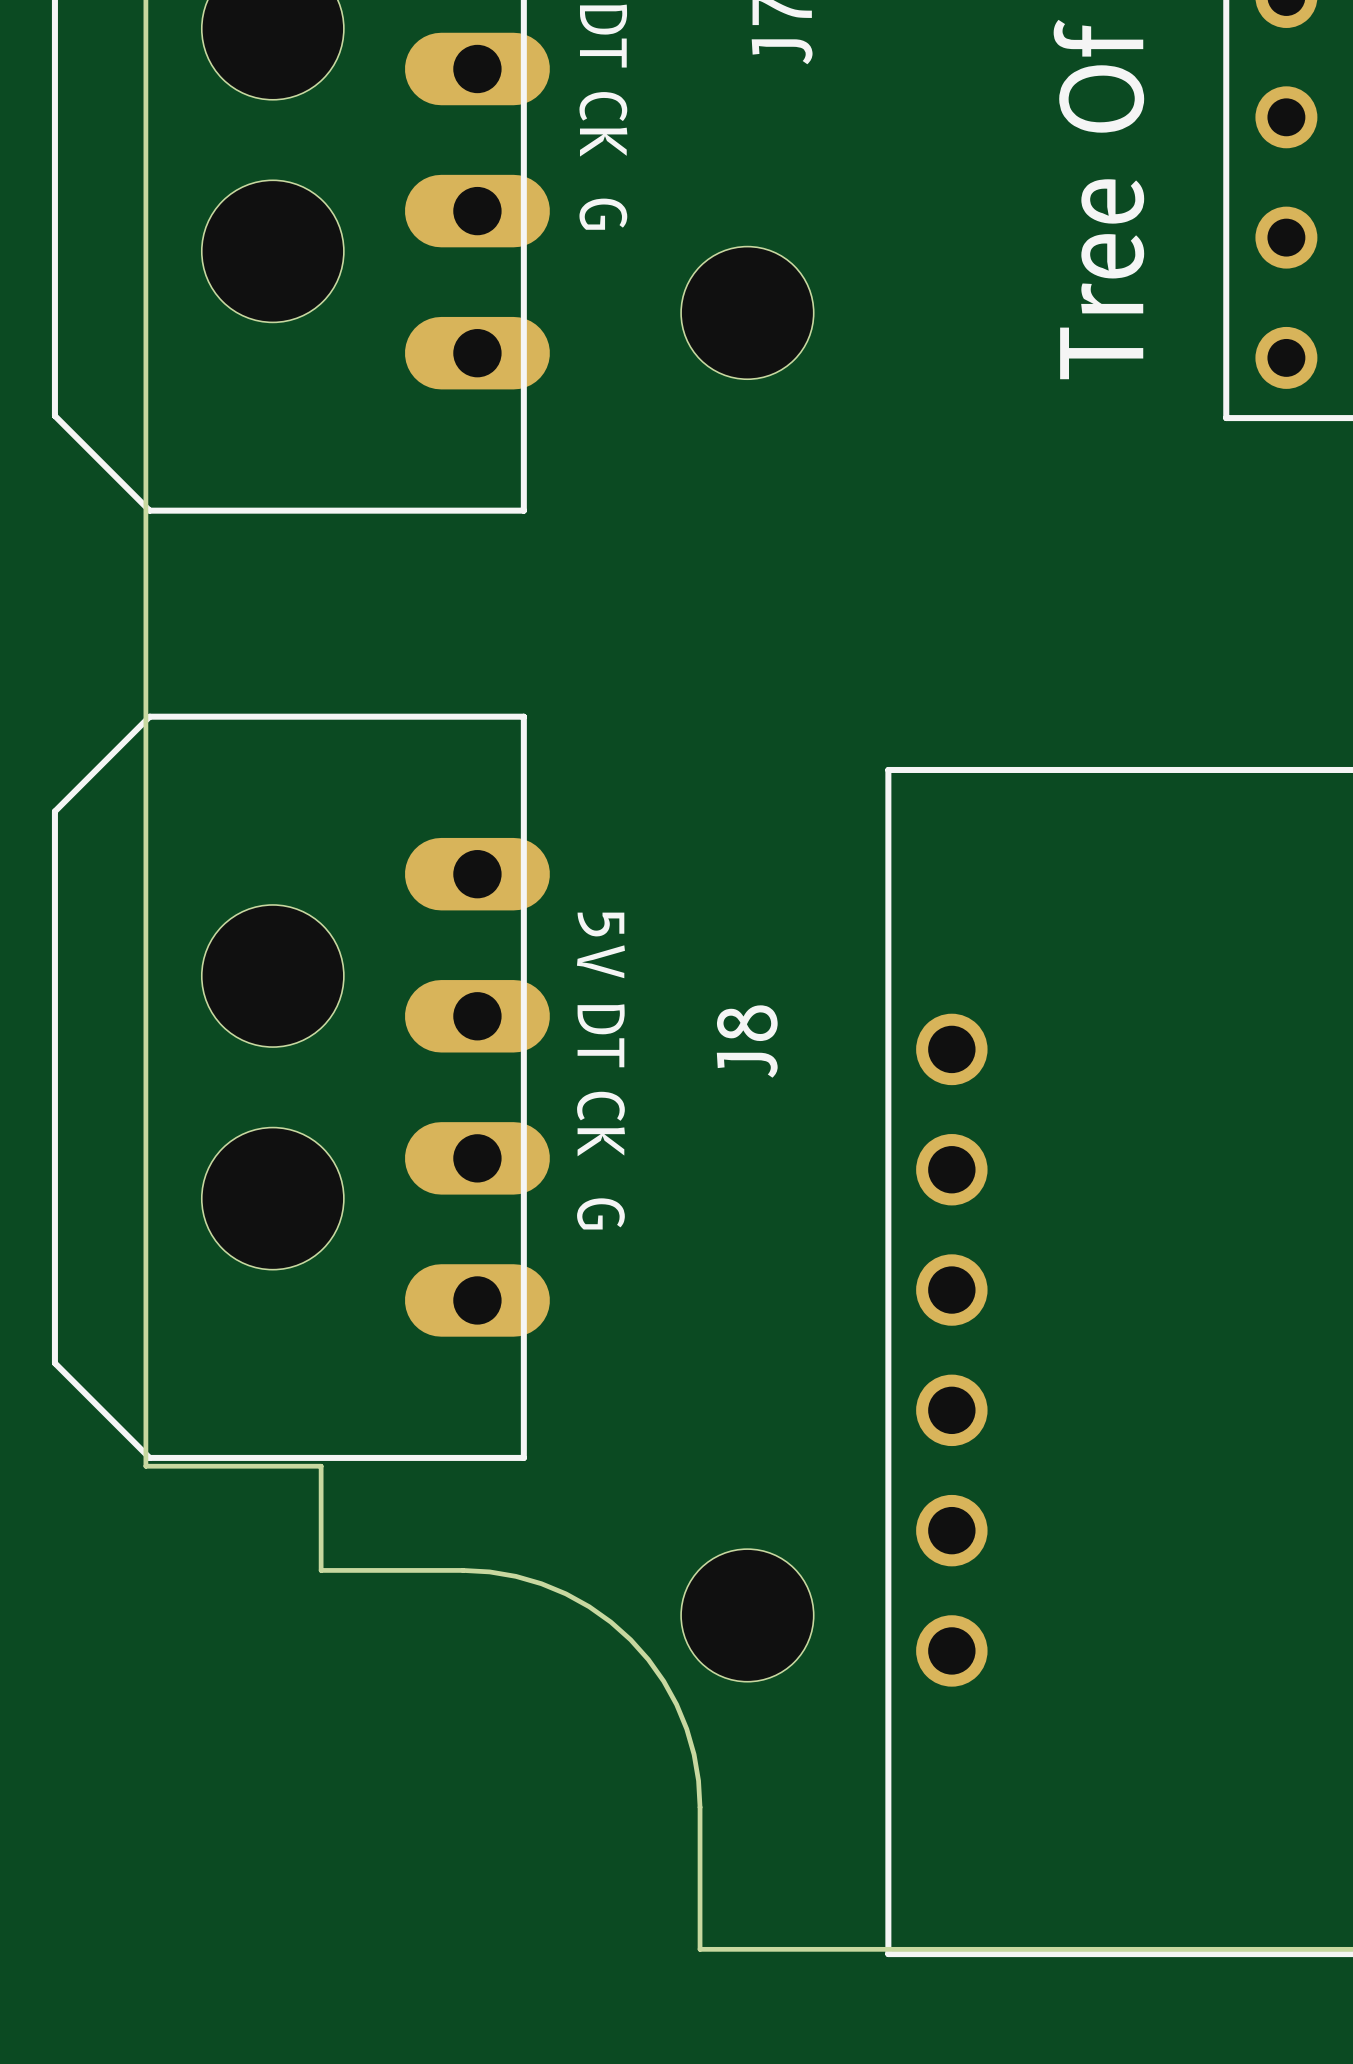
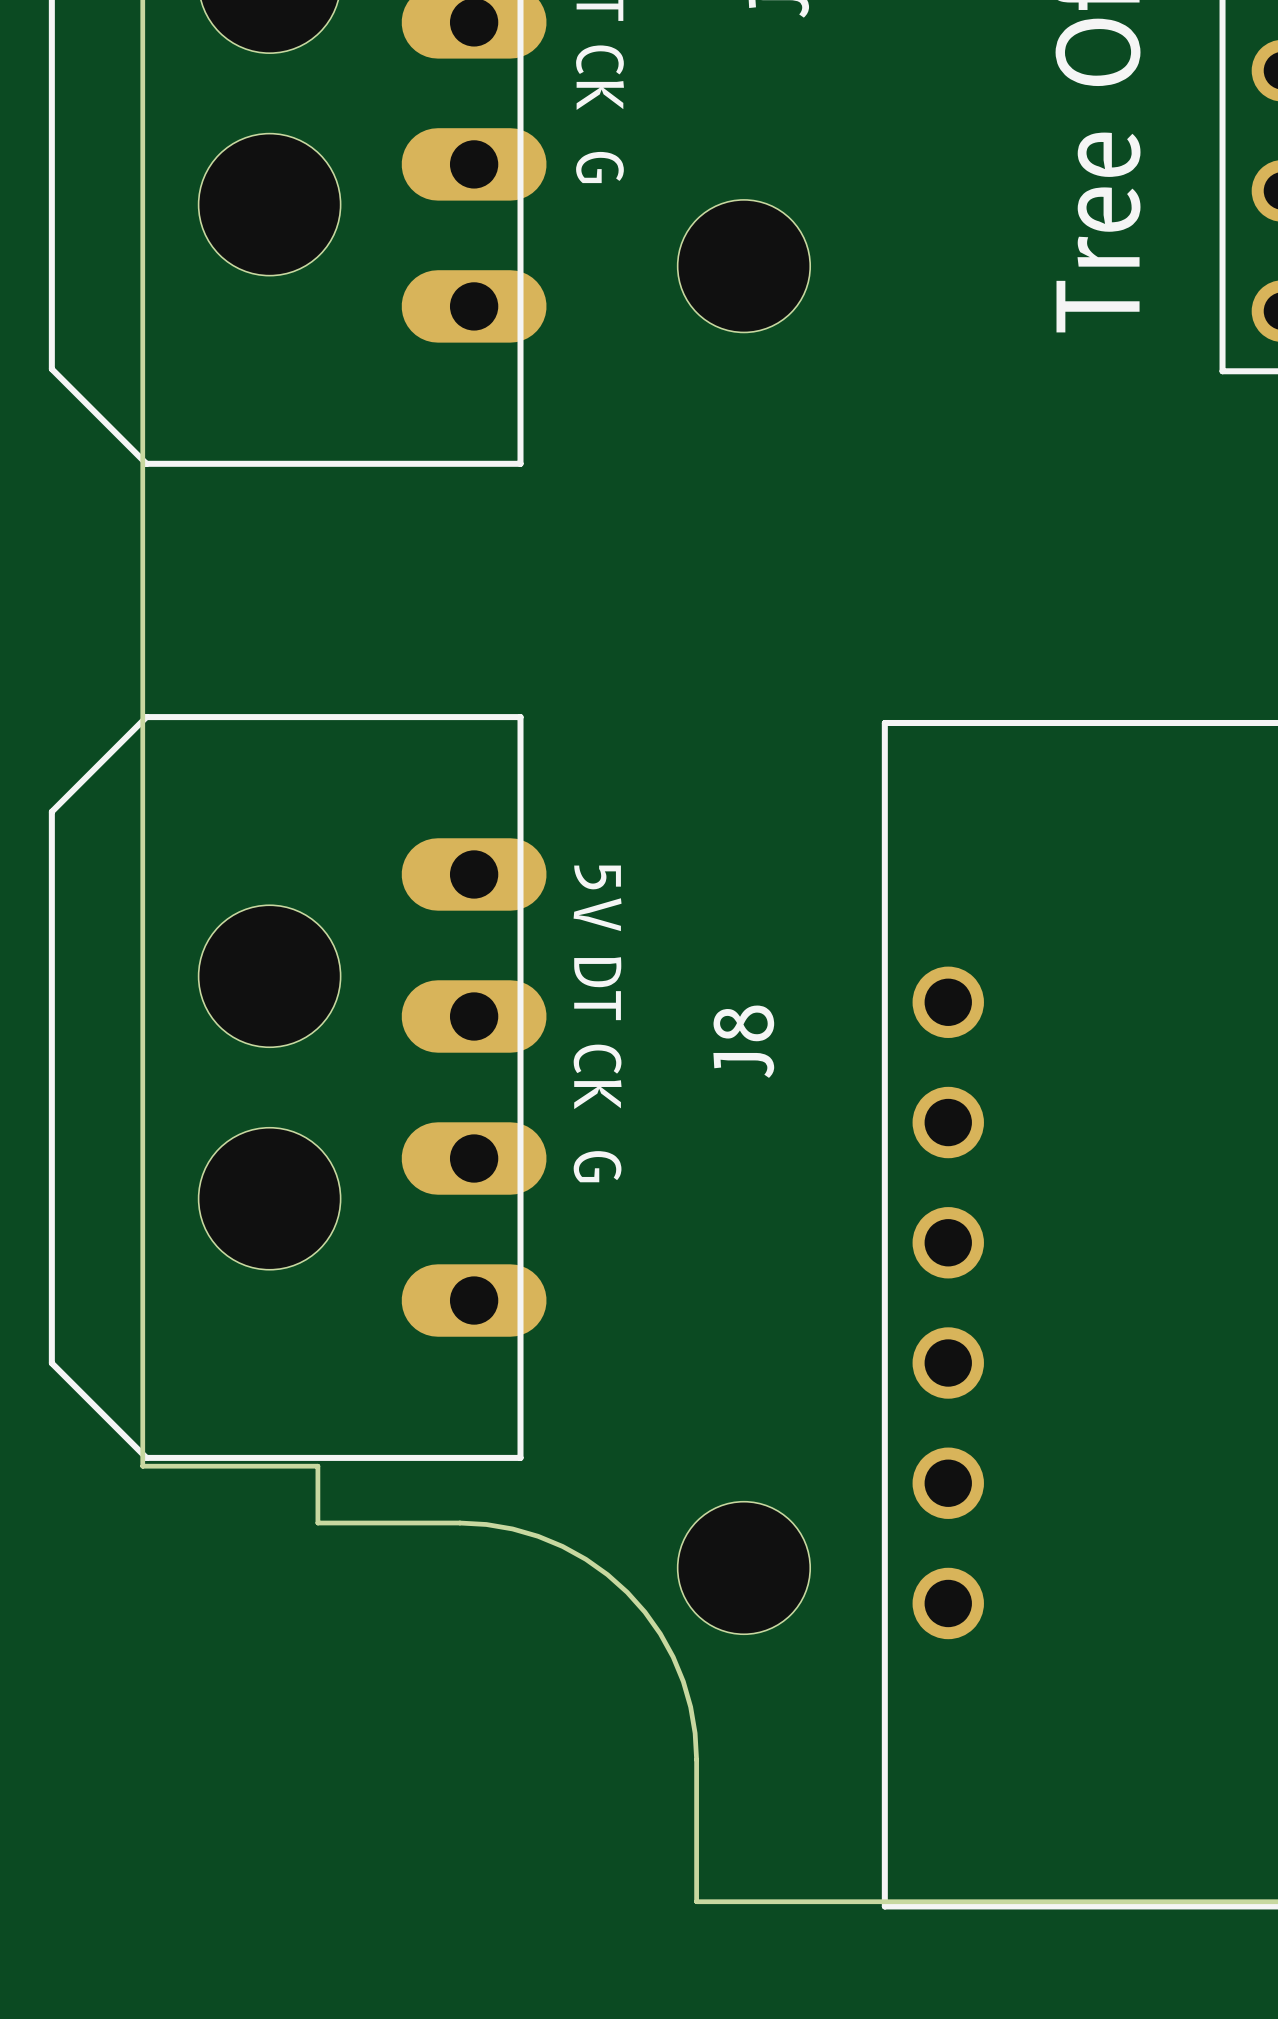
J8 position: (300, 1087) -> (297, 1087)
board edge: (145, 1466) (321, 1466) (321, 1513) -> (142, 1418) (142, 1466) (317, 1466)

